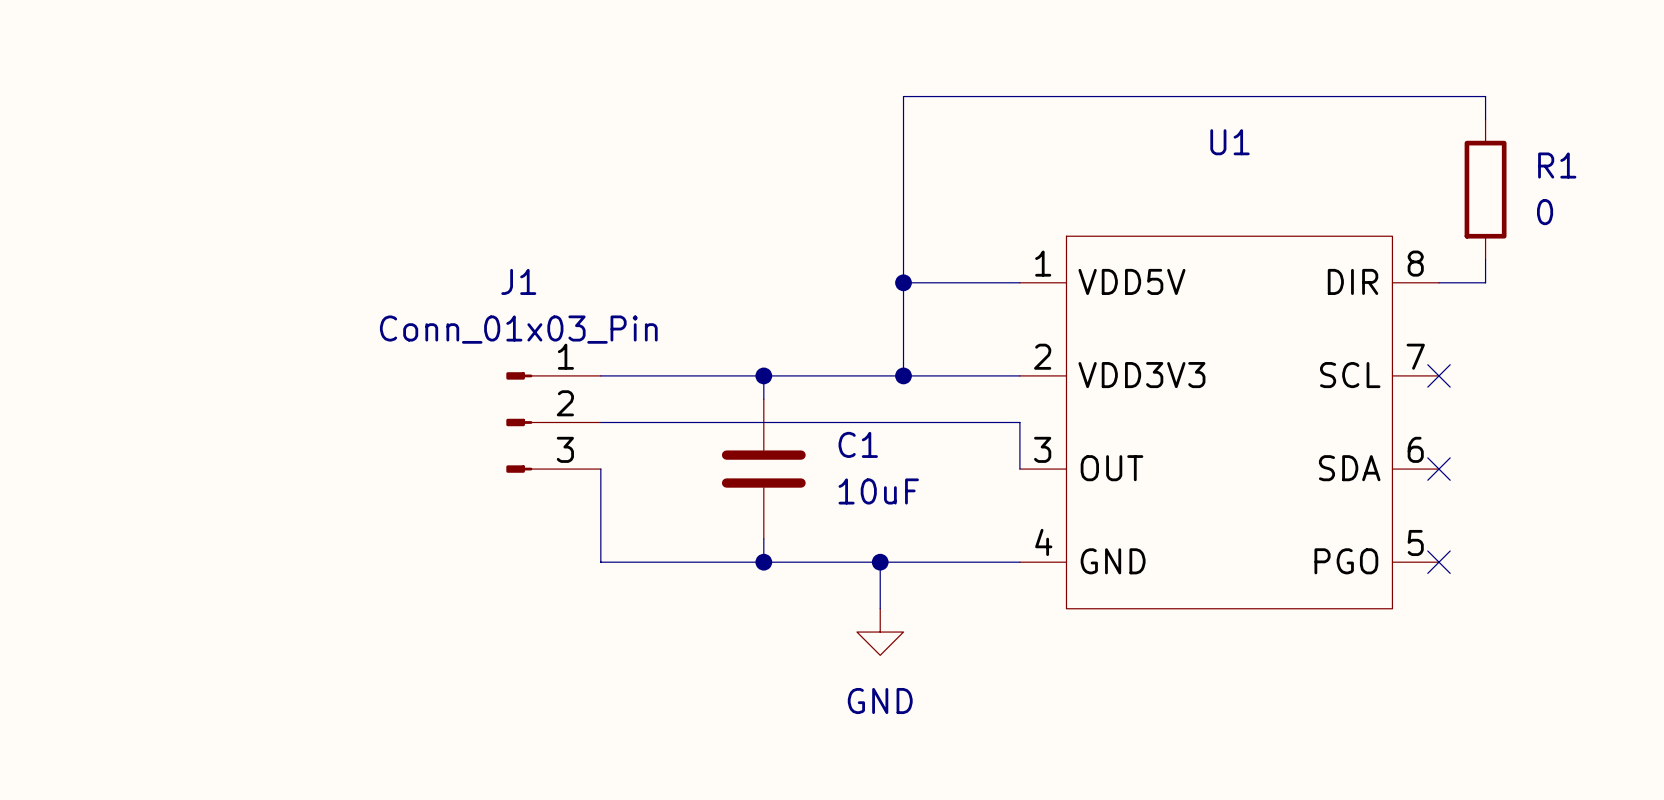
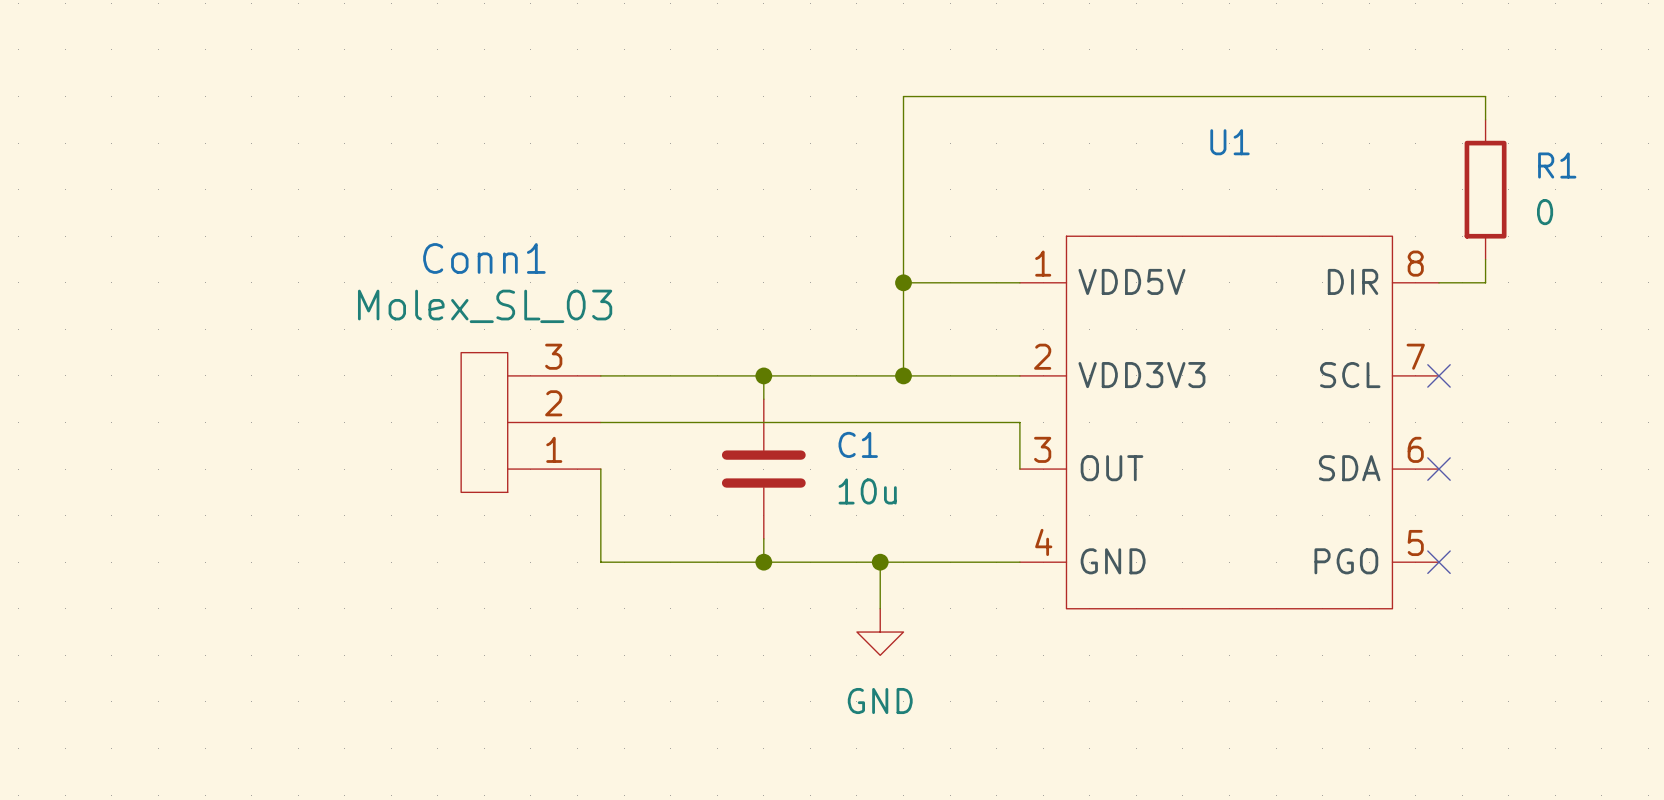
Conn1: none -> Molex_SL_03 (530, 422)
J1: Conn_01x03_Pin (553, 422) -> none
C1 value: 10uF (878, 491) -> 10u (867, 491)

